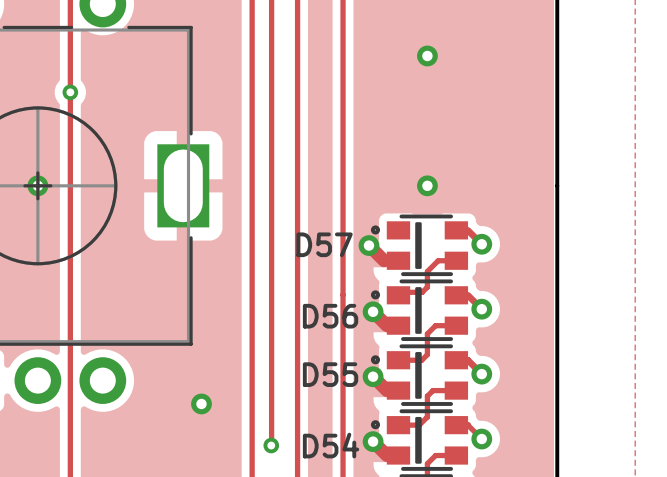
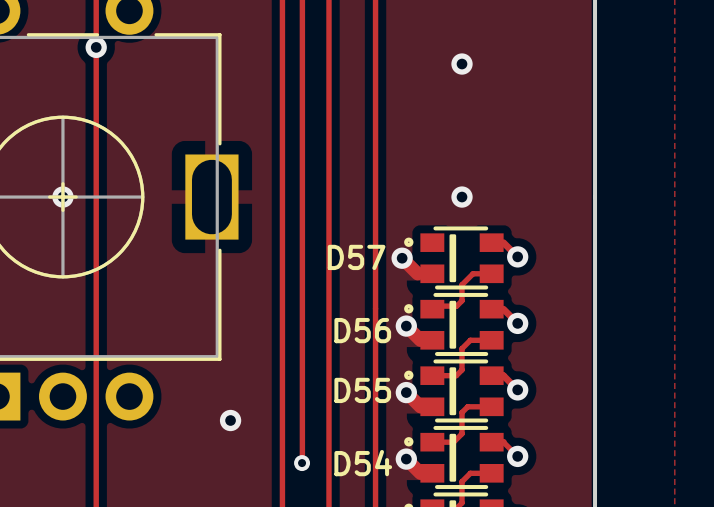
via: none -> (96, 47)
via: (70, 92) -> none

